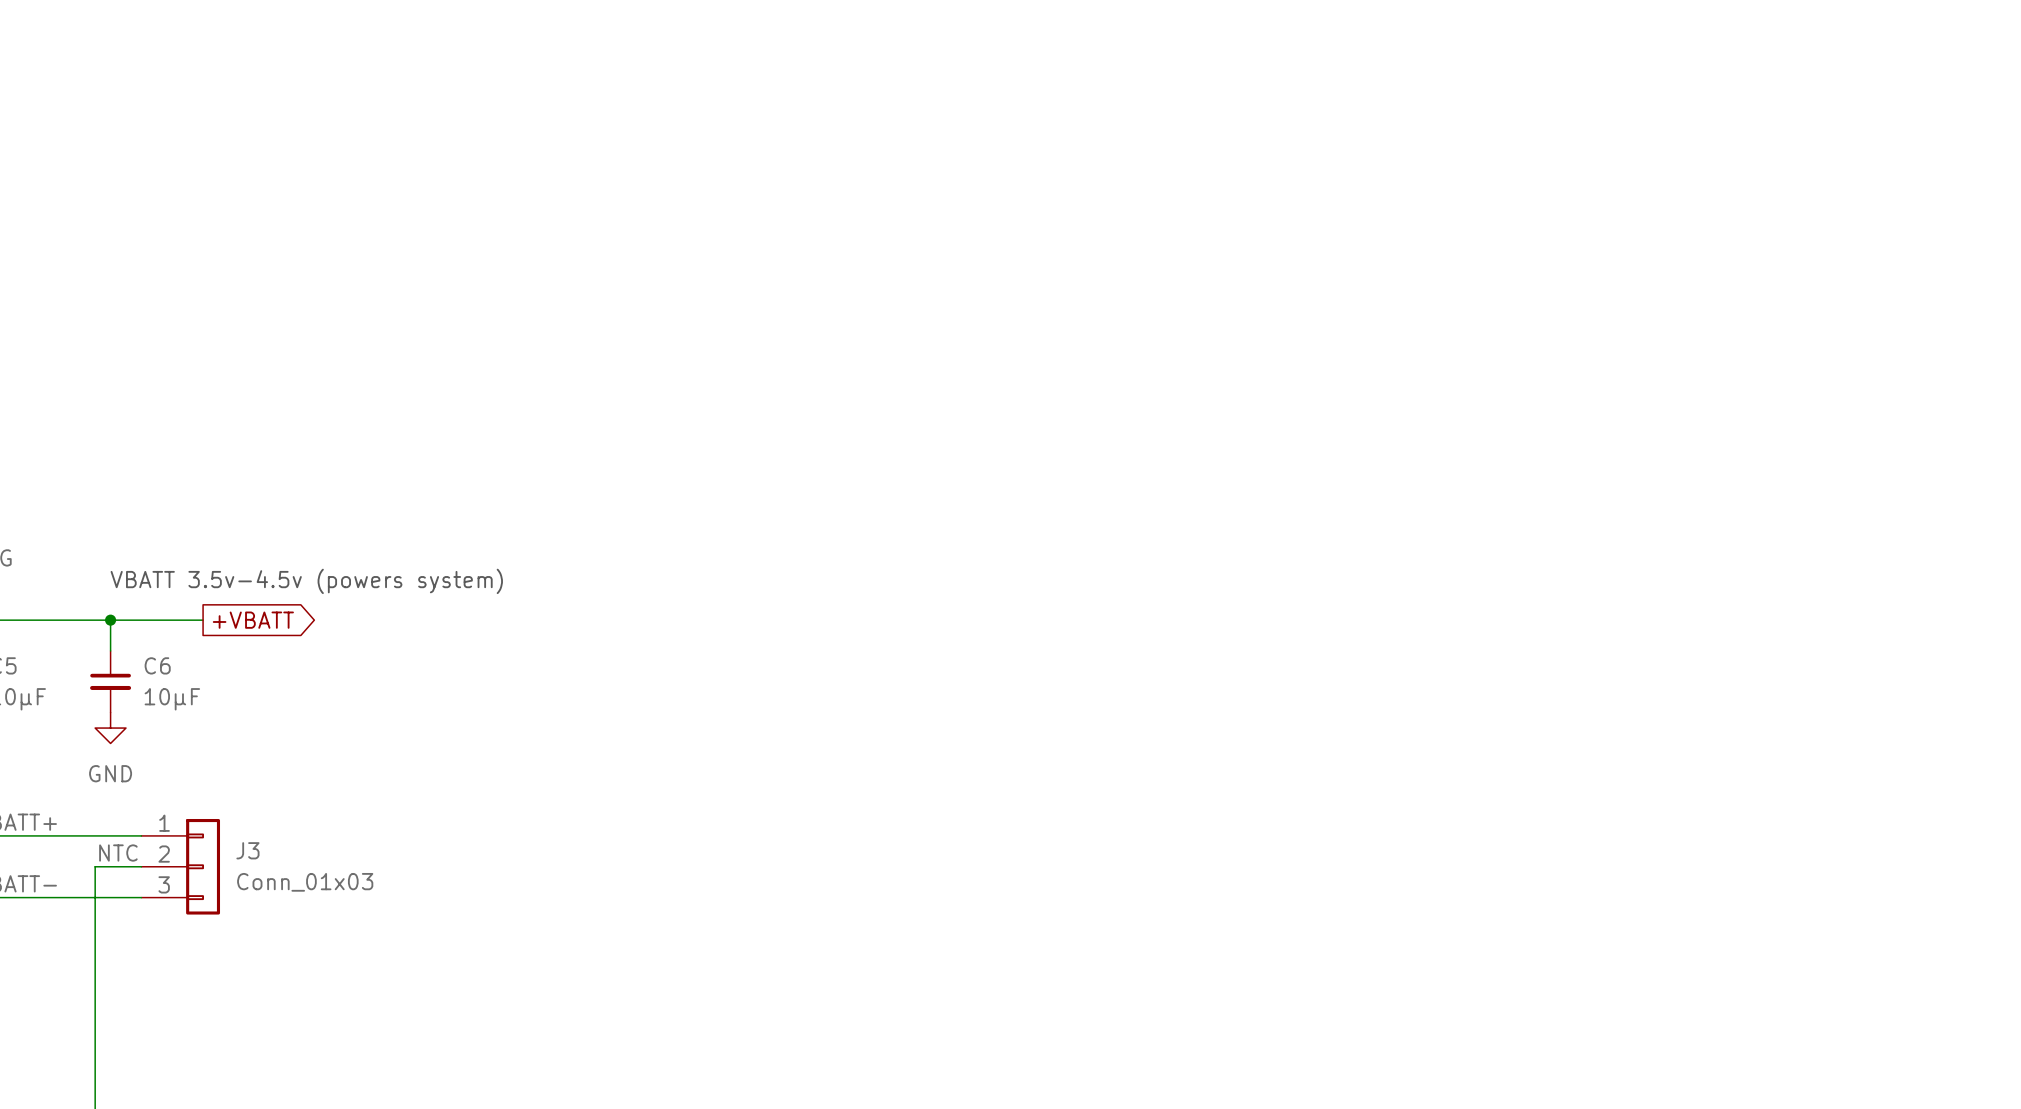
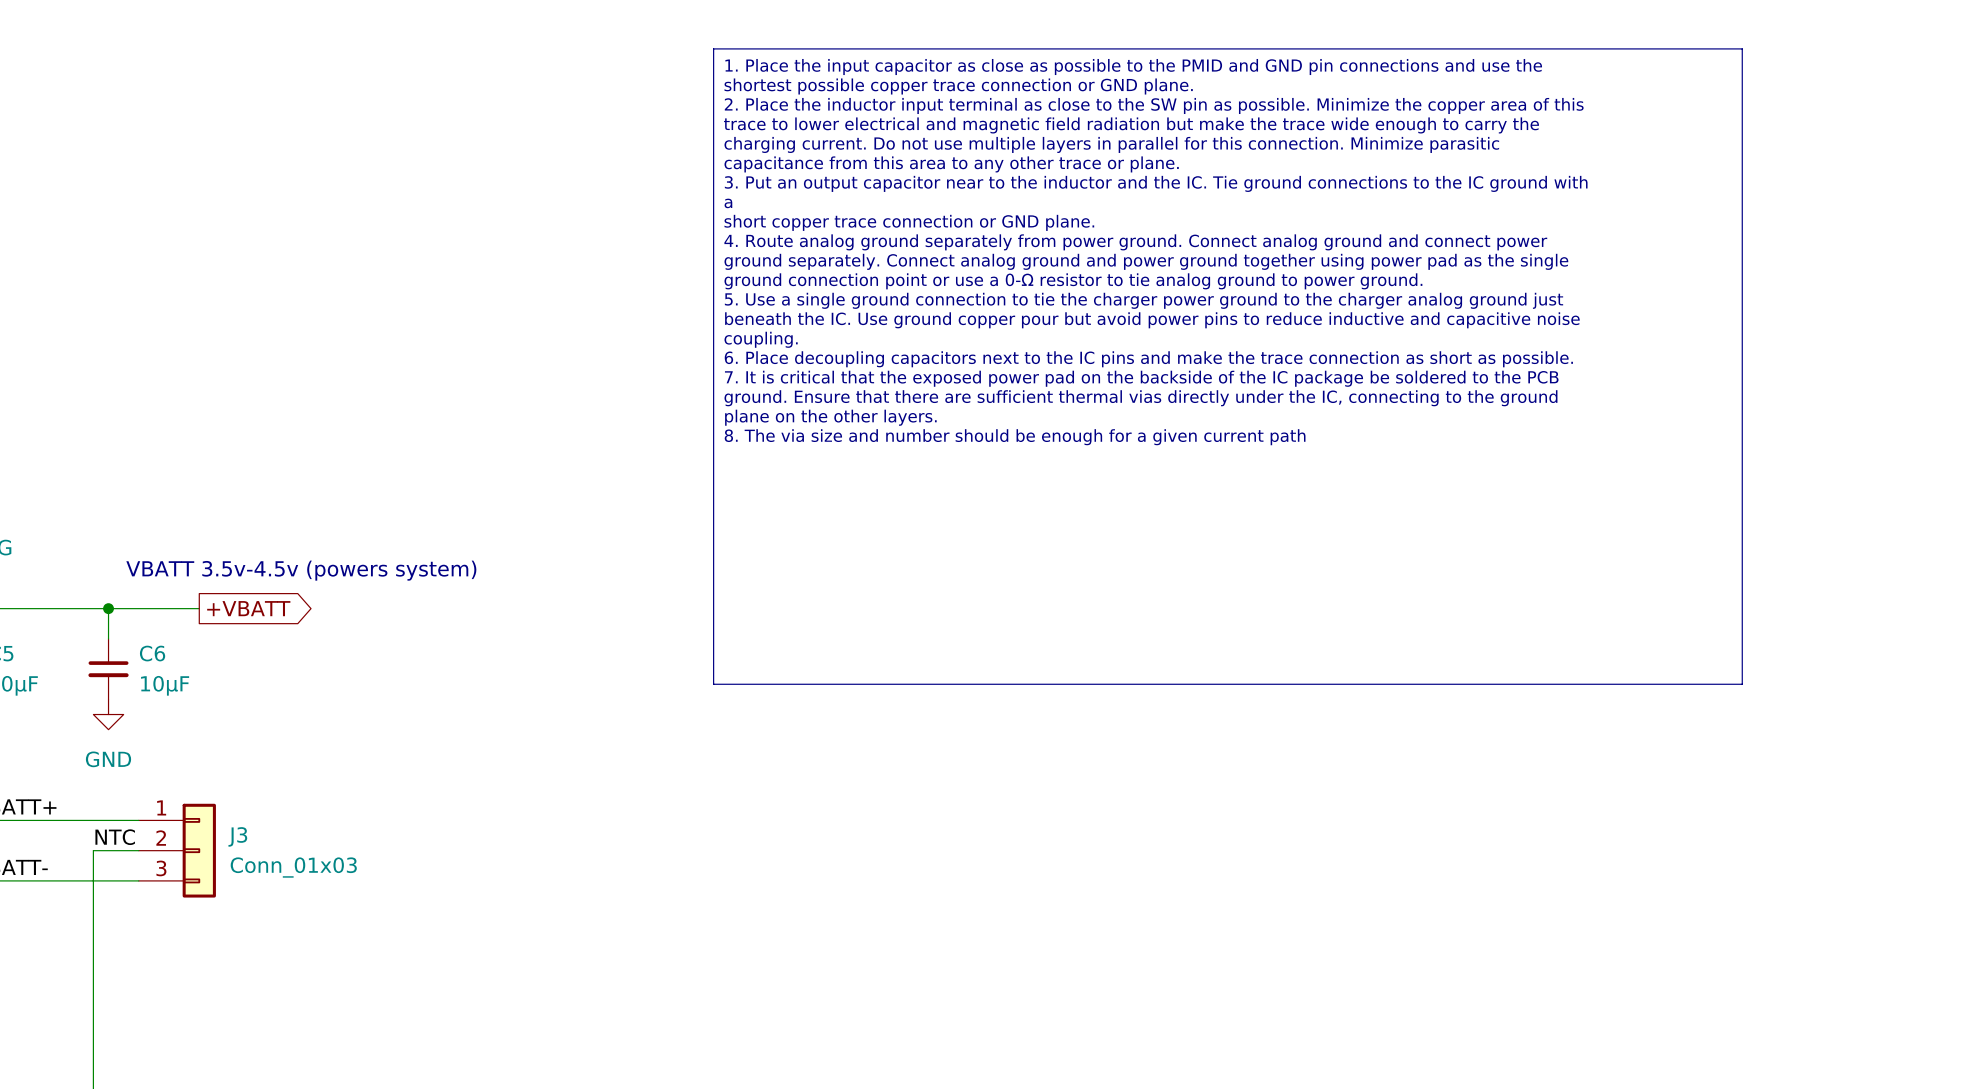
line: none -> (713, 48) (1742, 48) (1742, 684) (713, 684) (713, 48)
text: none -> 1. Place the input capacitor as close as possible to the PMID and GND pin connections and use the (1133, 67)
text: none -> shortest possible copper trace connection or GND plane. (958, 86)
text: none -> 2. Place the inductor input terminal as close to the SW pin as possible. Minimize the copper area of this (1154, 105)
text: none -> trace to lower electrical and magnetic field radiation but make the trace wide enough to carry the (1131, 125)
text: none -> charging current. Do not use multiple layers in parallel for this connection. Minimize parasitic (1111, 144)
text: none -> capacitance from this area to any other trace or plane. (951, 164)
text: none -> 3. Put an output capacitor near to the inductor and the IC. Tie ground connections to the IC ground with (1156, 183)
text: none -> a (728, 203)
text: none -> short copper trace connection or GND plane. (909, 222)
text: none -> 4. Route analog ground separately from power ground. Connect analog ground and connect power (1135, 242)
text: none -> ground separately. Connect analog ground and power ground together using power pad as the single (1146, 261)
text: none -> ground connection point or use a 0-Ω resistor to tie analog ground to power ground. (1073, 281)
text: none -> 5. Use a single ground connection to tie the charger power ground to the charger analog ground just (1144, 300)
text: none -> beneath the IC. Use ground copper pour but avoid power pins to reduce inductive and capacitive noise (1152, 320)
text: none -> coupling. (761, 339)
text: none -> 6. Place decoupling capacitors next to the IC pins and make the trace connection as short as possible. (1148, 359)
text: none -> 7. It is critical that the exposed power pad on the backside of the IC package be soldered to the PCB (1141, 378)
text: none -> ground. Ensure that there are sufficient thermal vias directly under the IC, connecting to the ground (1140, 398)
text: none -> plane on the other layers. (830, 417)
text: none -> 8. The via size and number should be enough for a given current path (1015, 437)

